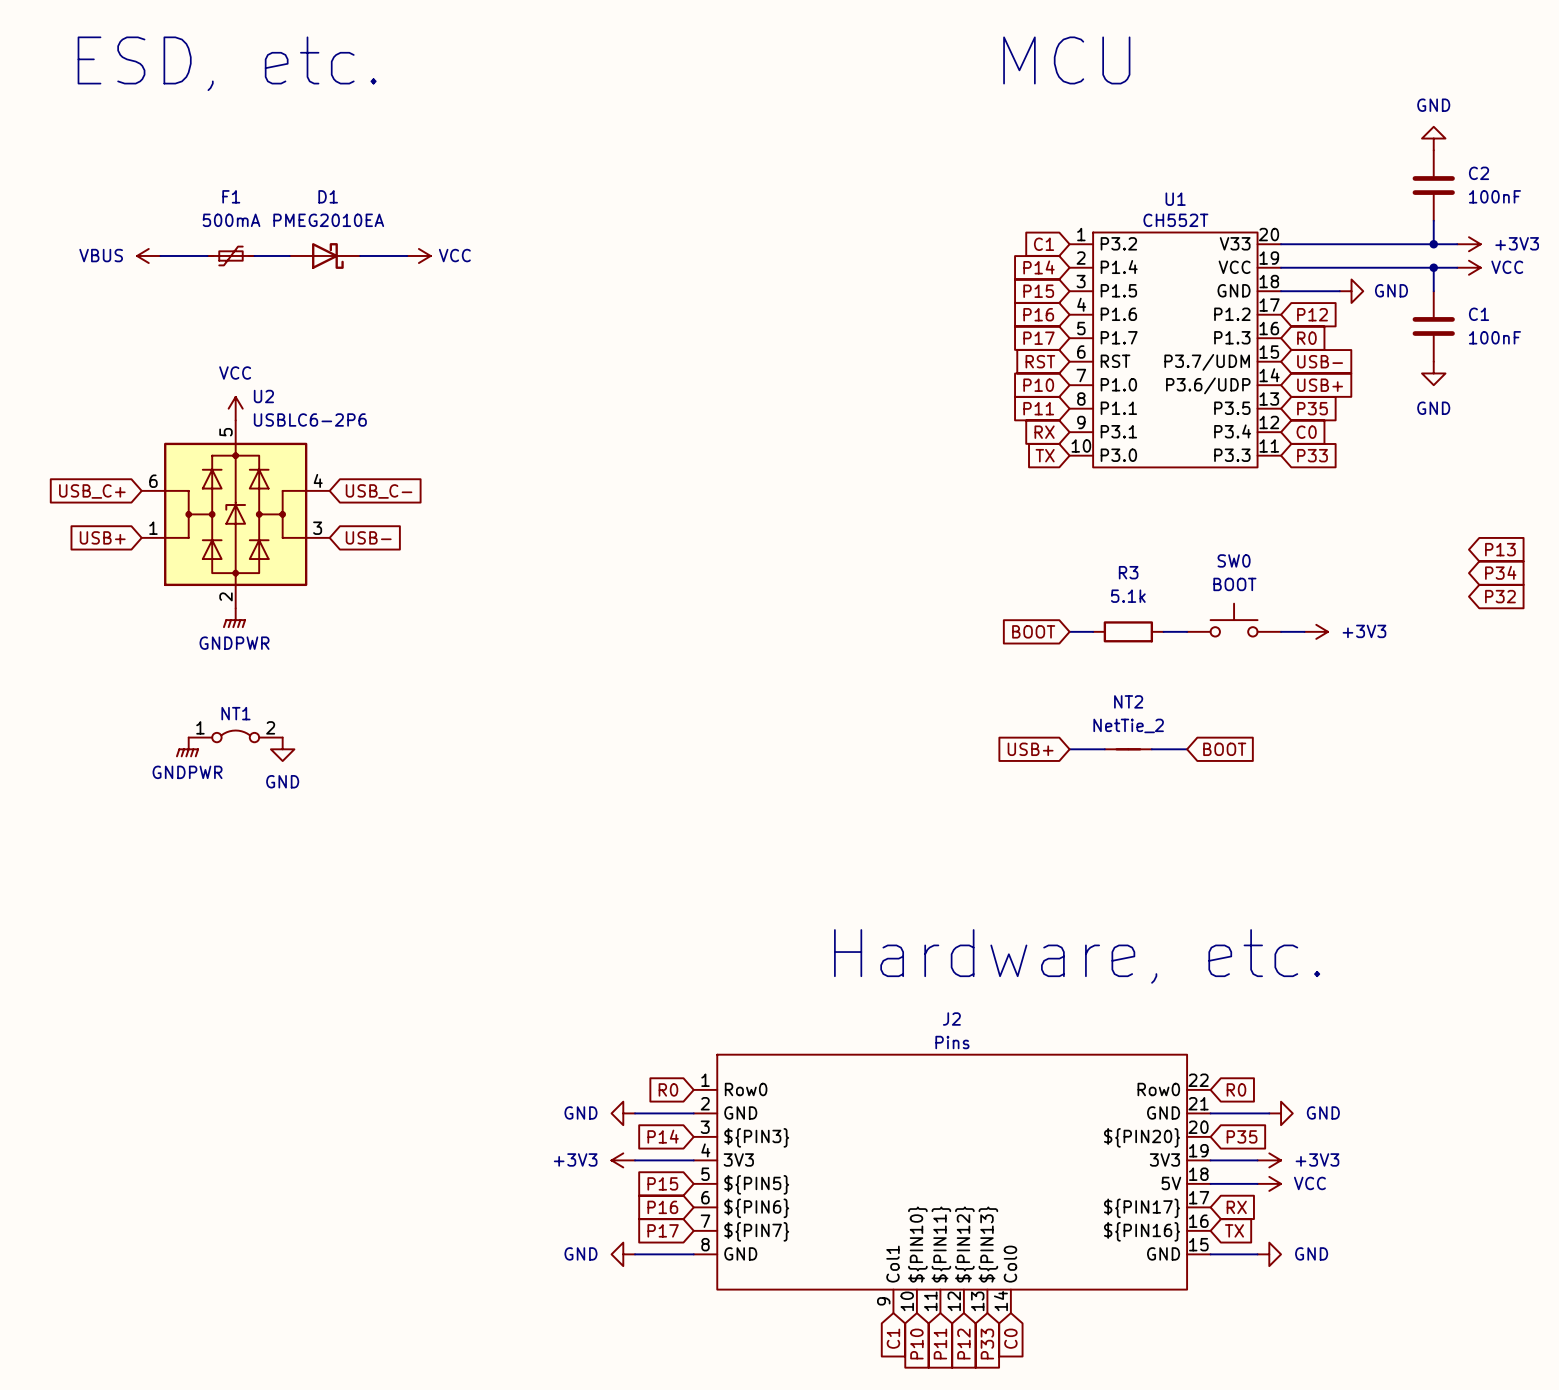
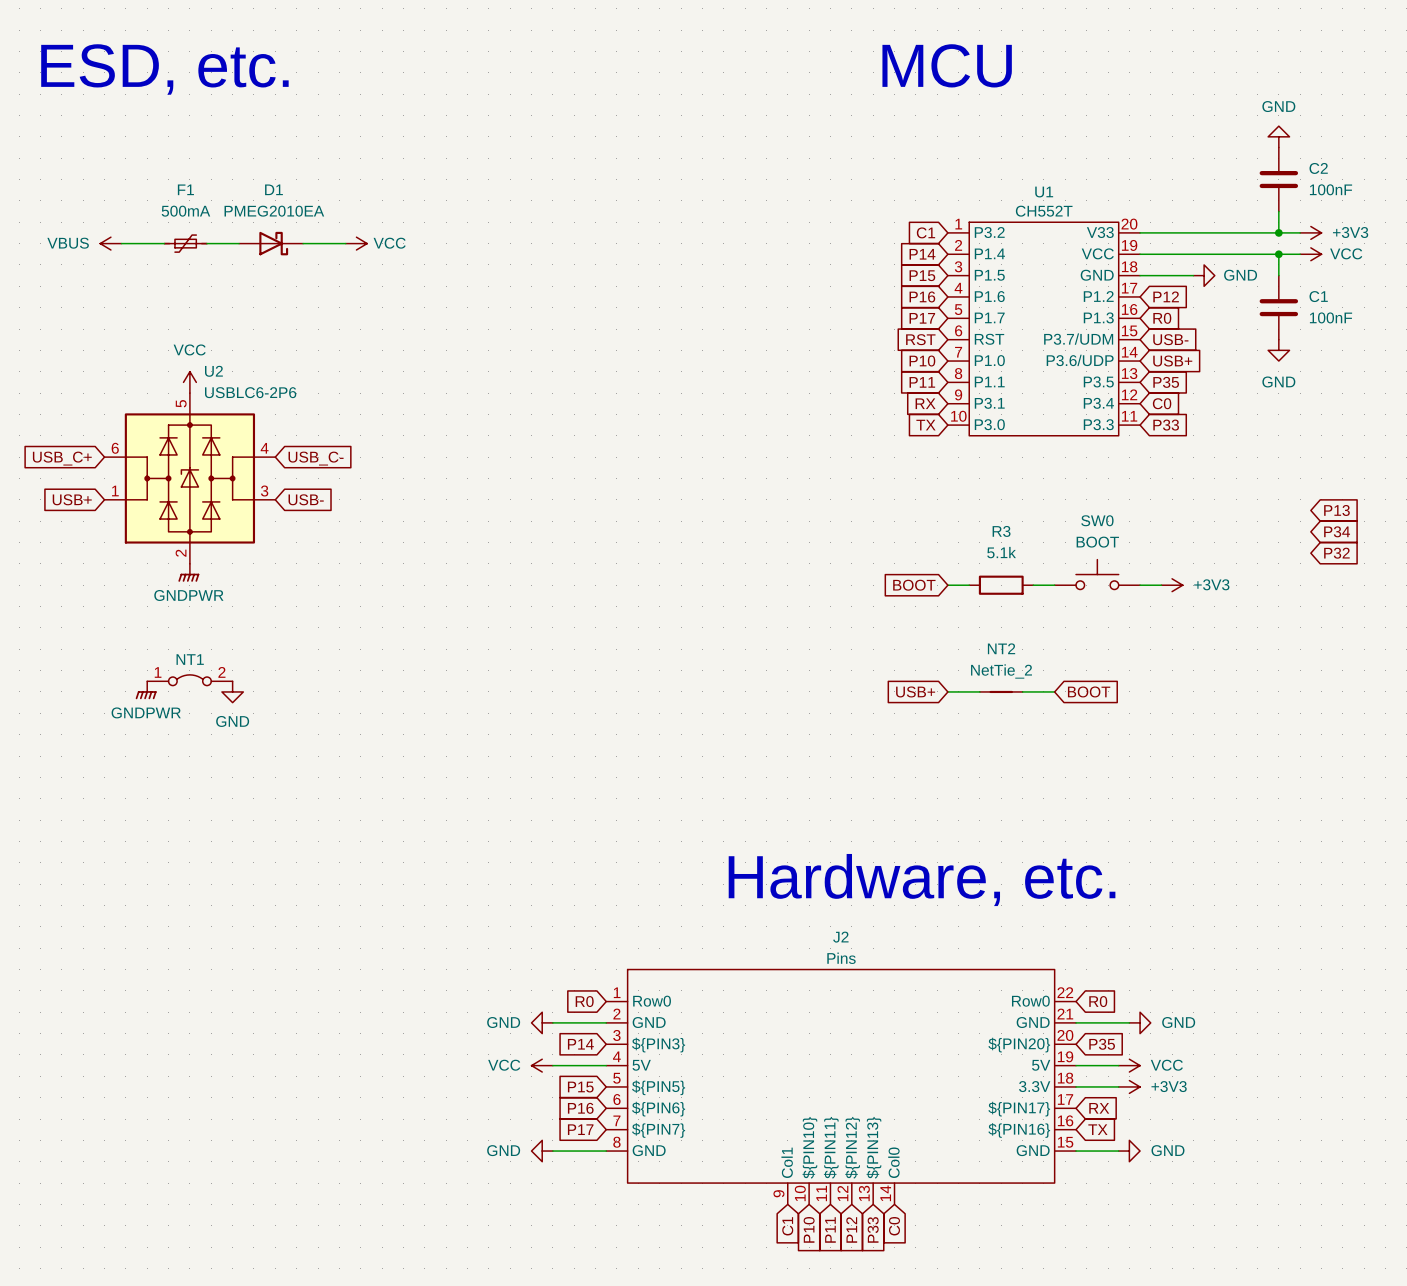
J2 pin name: 3V3 (738, 1159) -> 5V (641, 1065)
J2 pin name: 3V3 (1164, 1159) -> 5V (1041, 1065)
power symbol: +3V3 (623, 1160) -> VCC (542, 1065)
power symbol: +3V3 (1269, 1160) -> VCC (1129, 1065)
J2 pin name: 5V (1171, 1183) -> 3.3V (1034, 1086)
power symbol: VCC (1269, 1183) -> +3V3 (1129, 1086)

